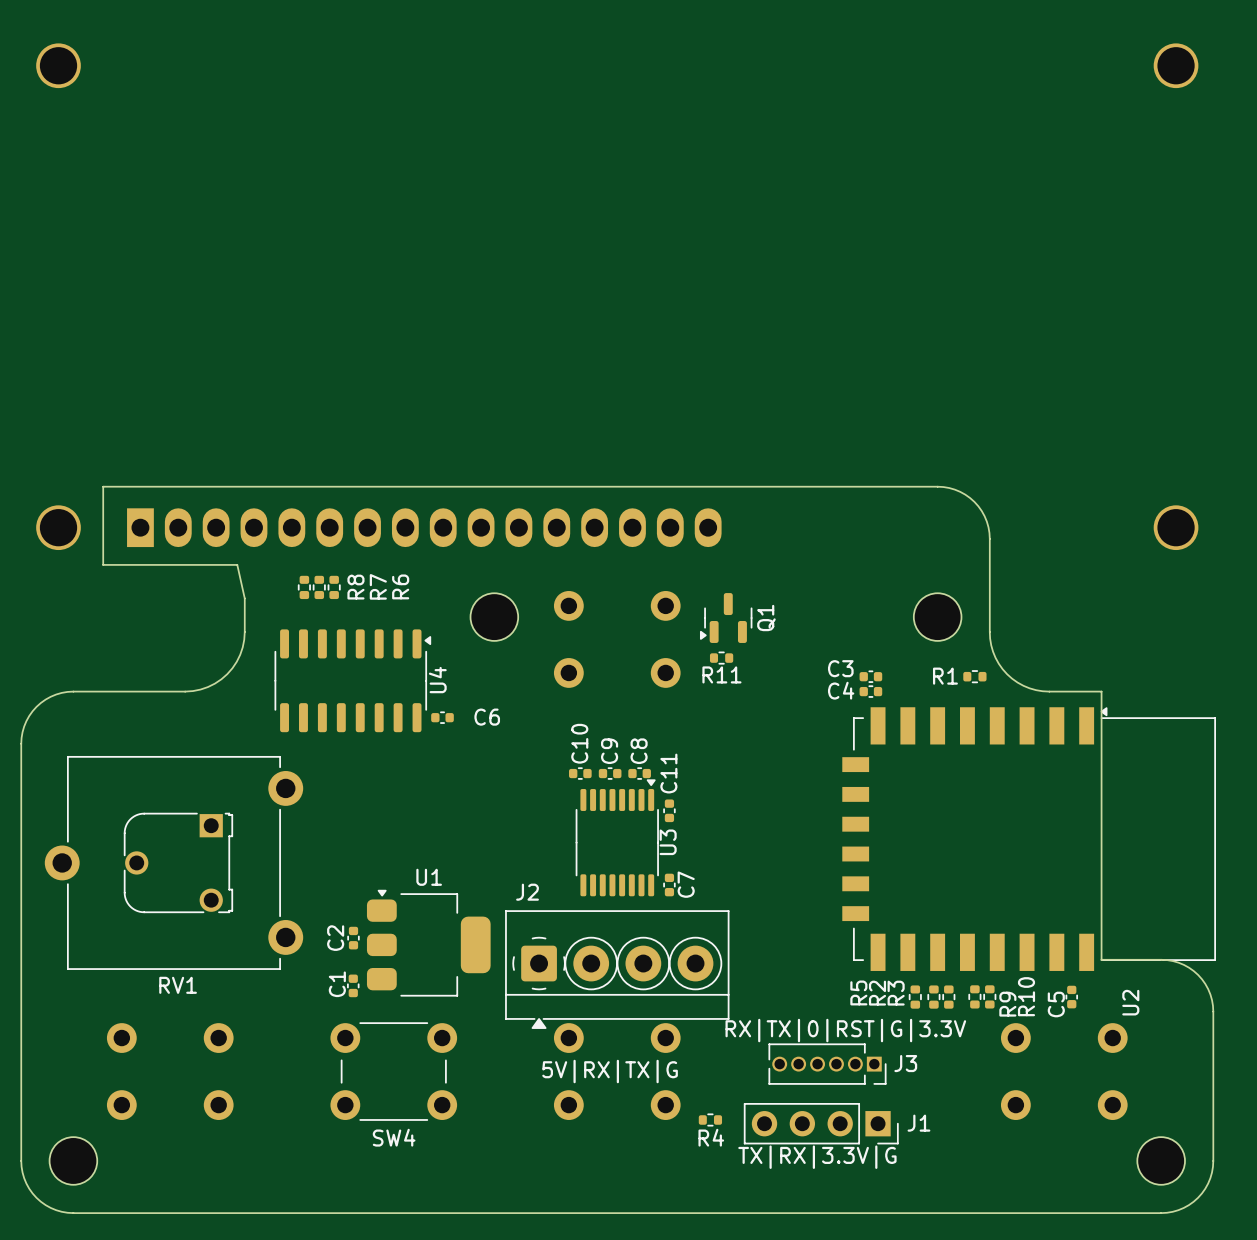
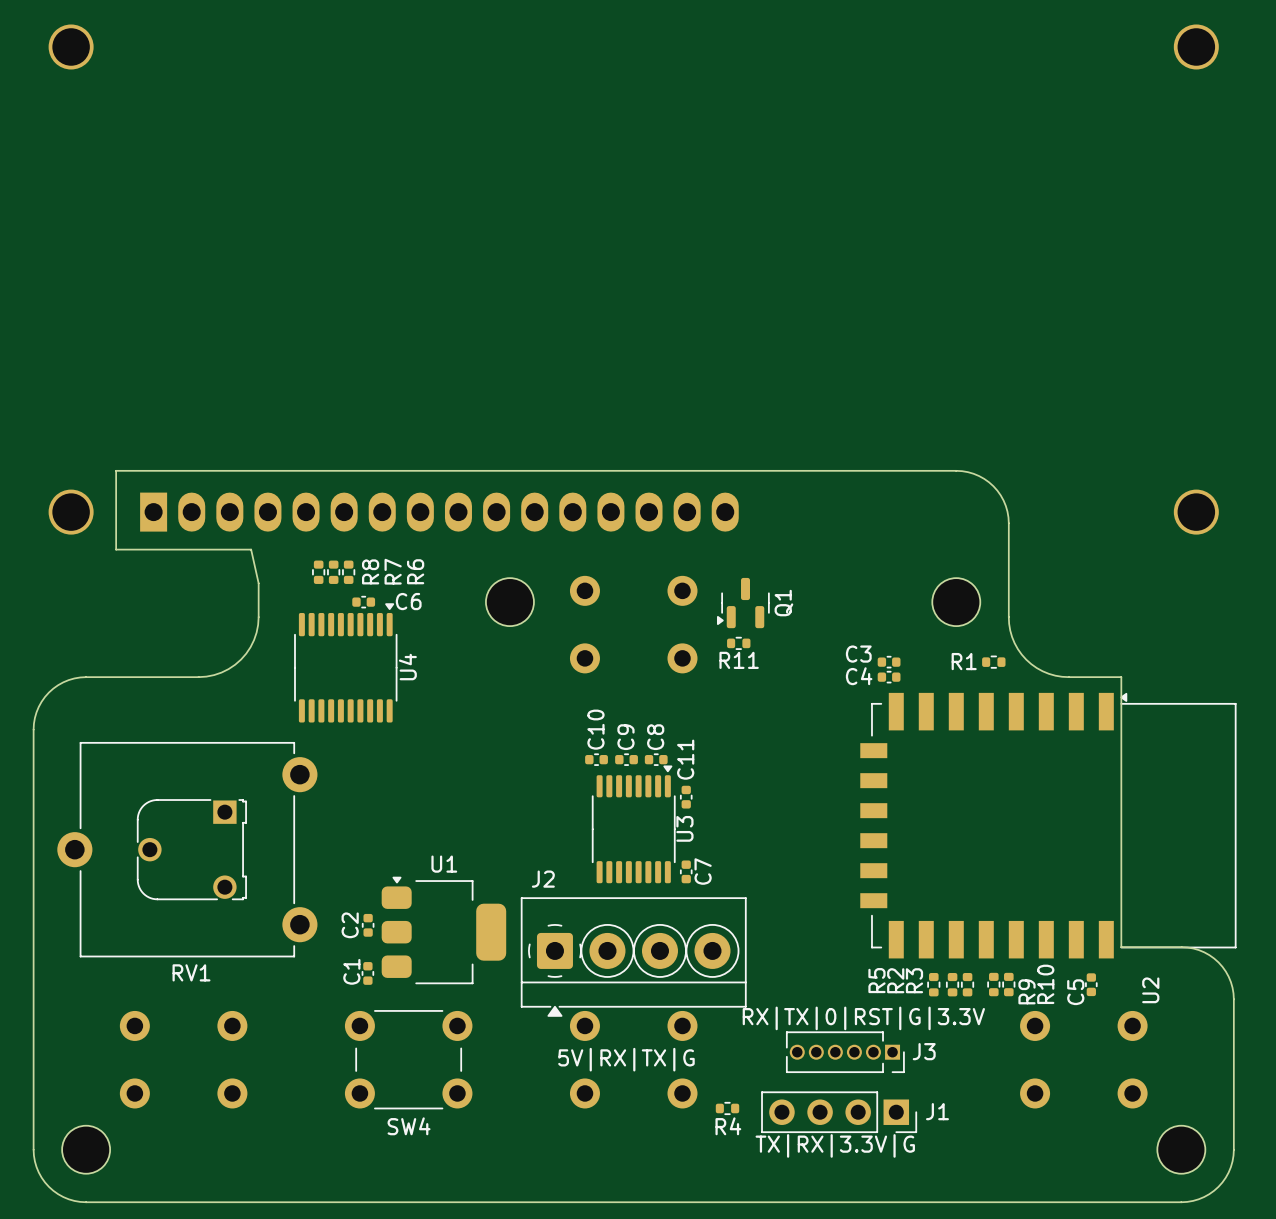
U4 footprint: [274, 629, 432, 733] -> [294, 603, 398, 723]
C6 position: (442, 717) -> (363, 602)

